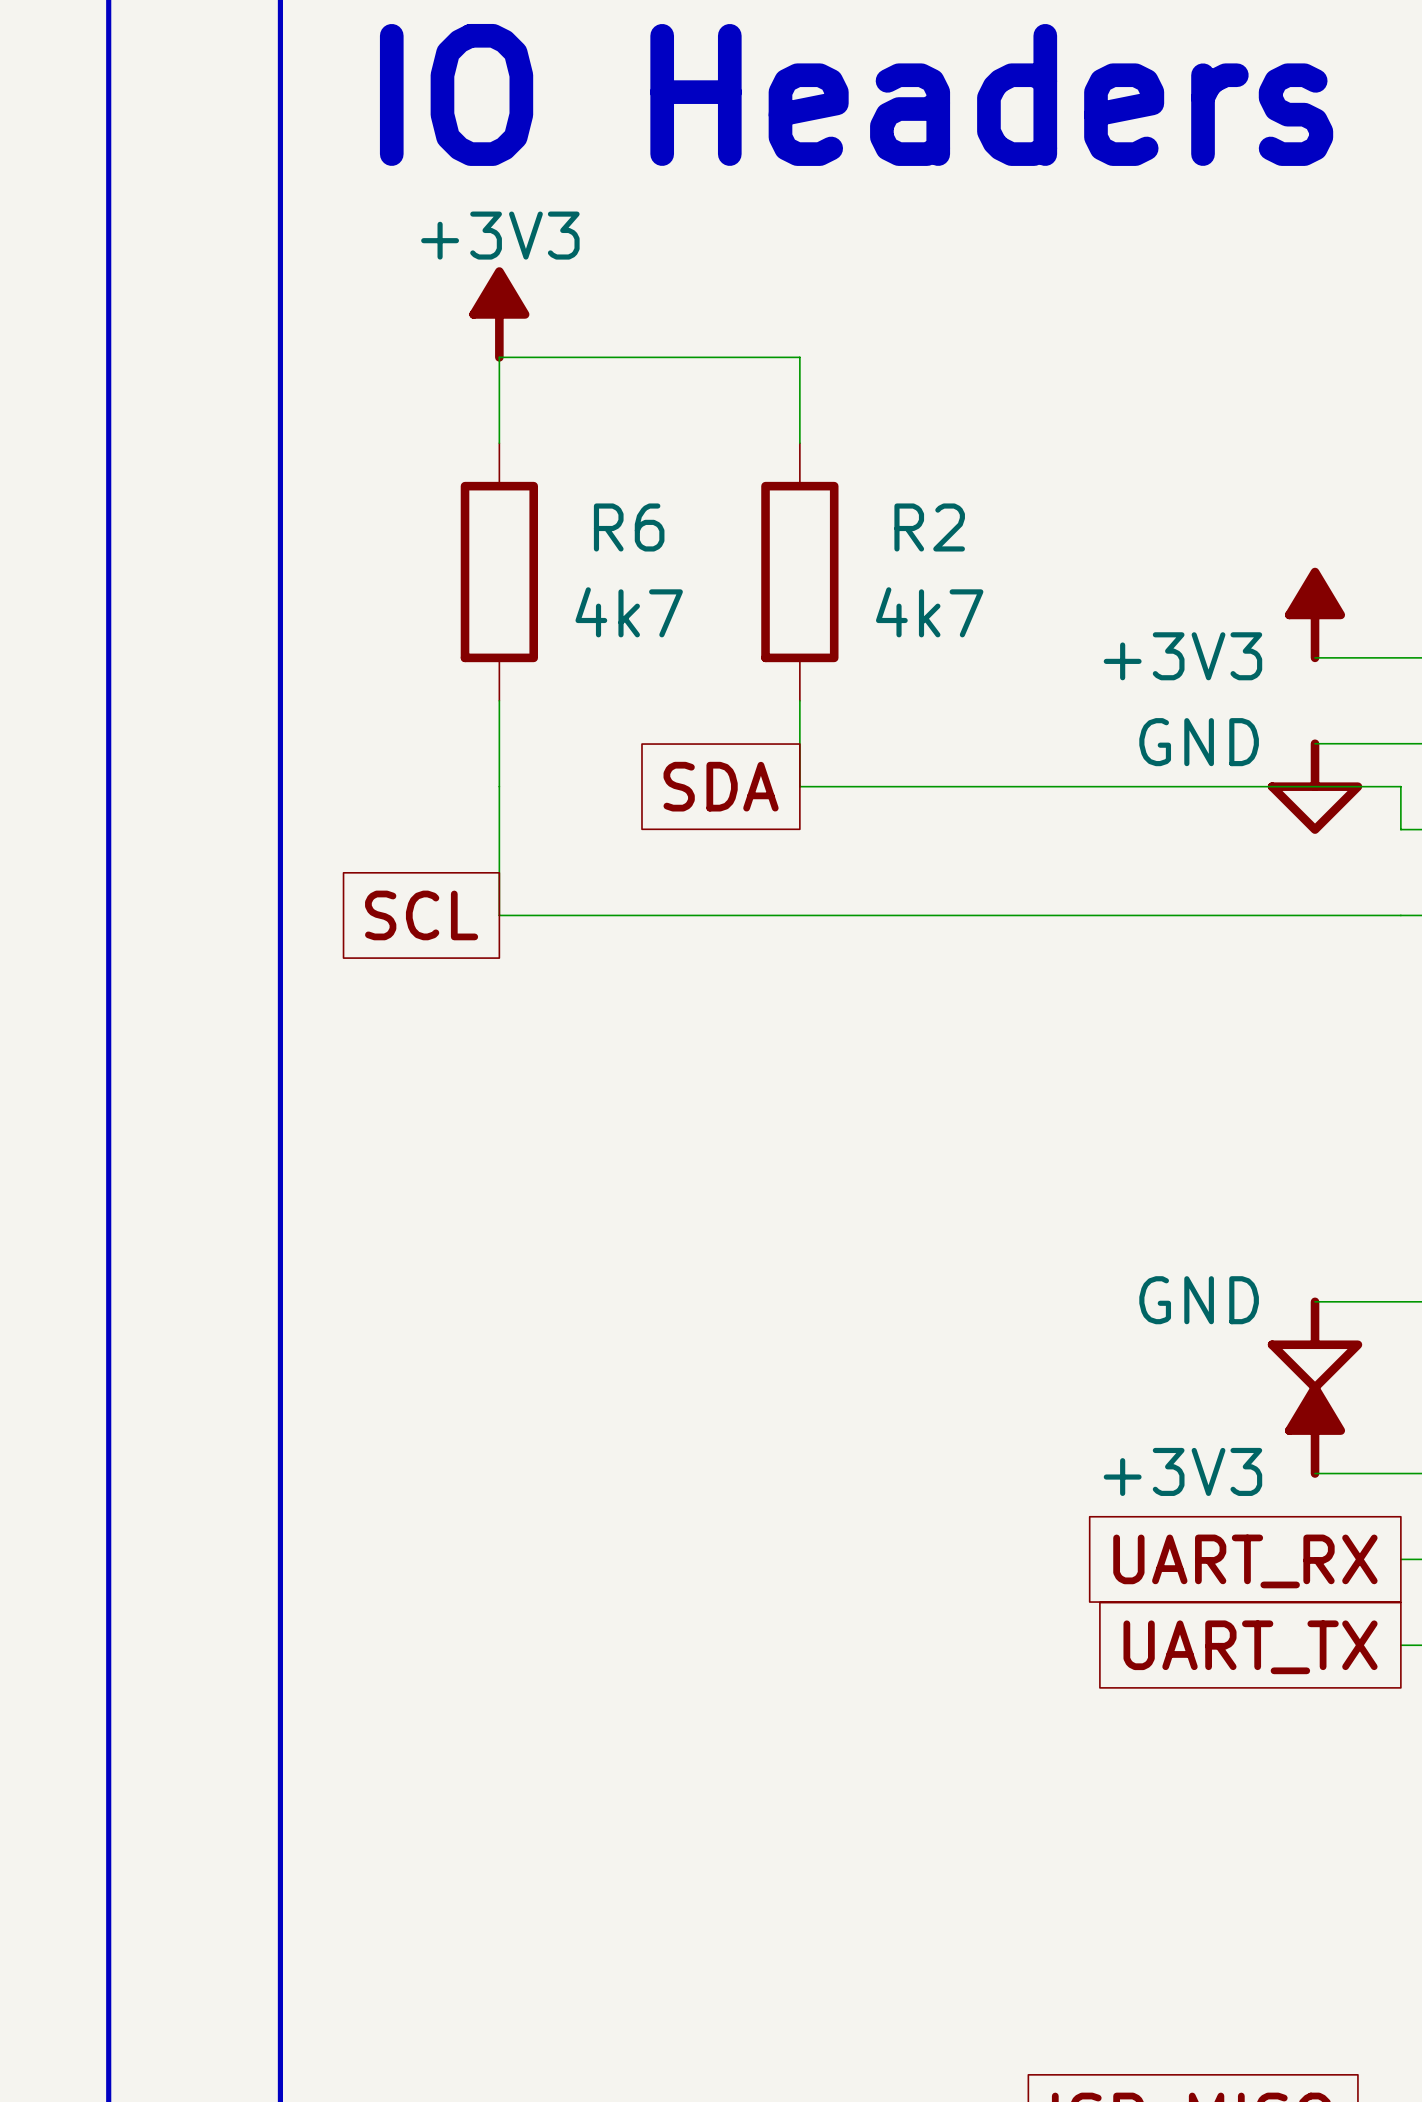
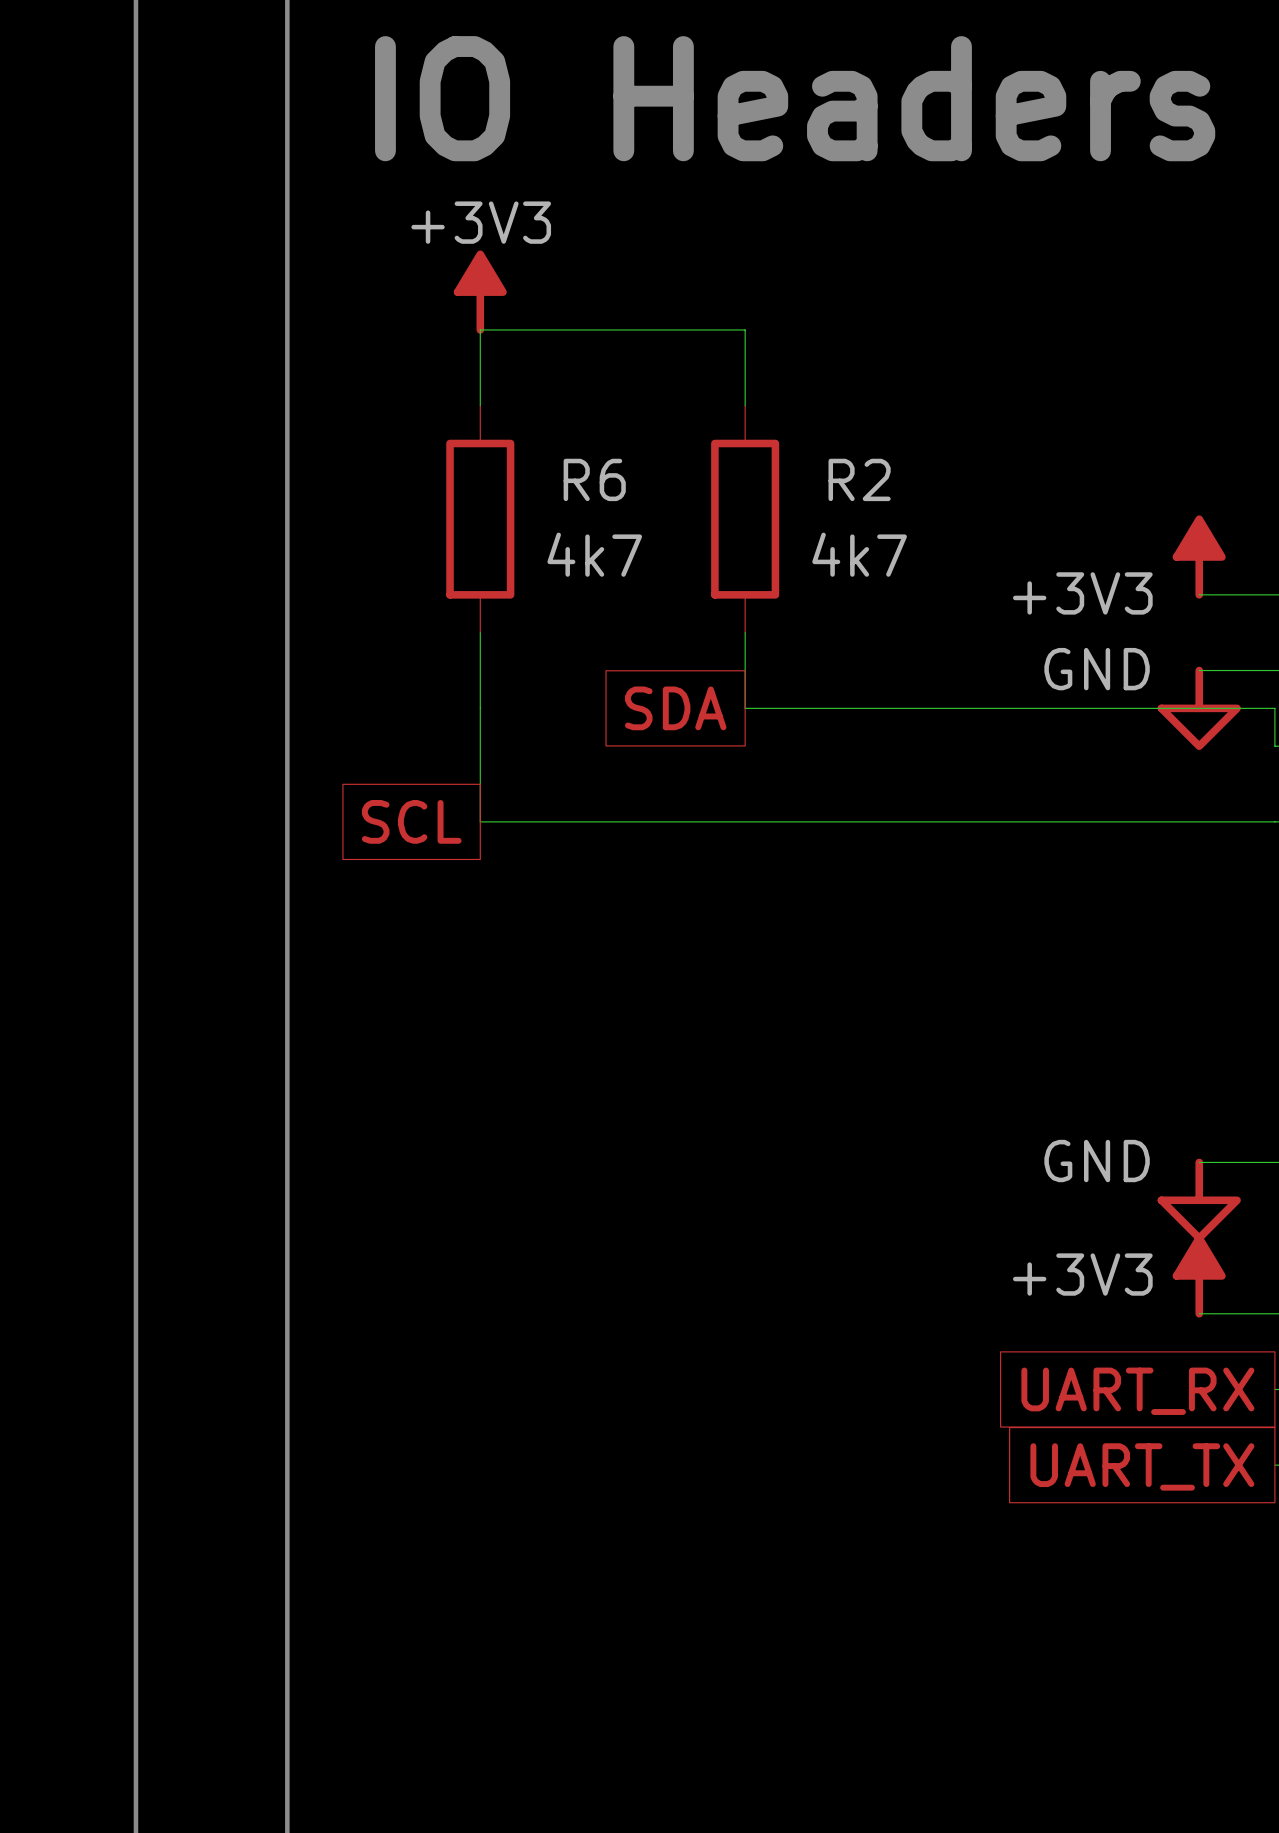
power symbol text position: +3V3 (1182, 1471) -> +3V3 (1082, 1274)

